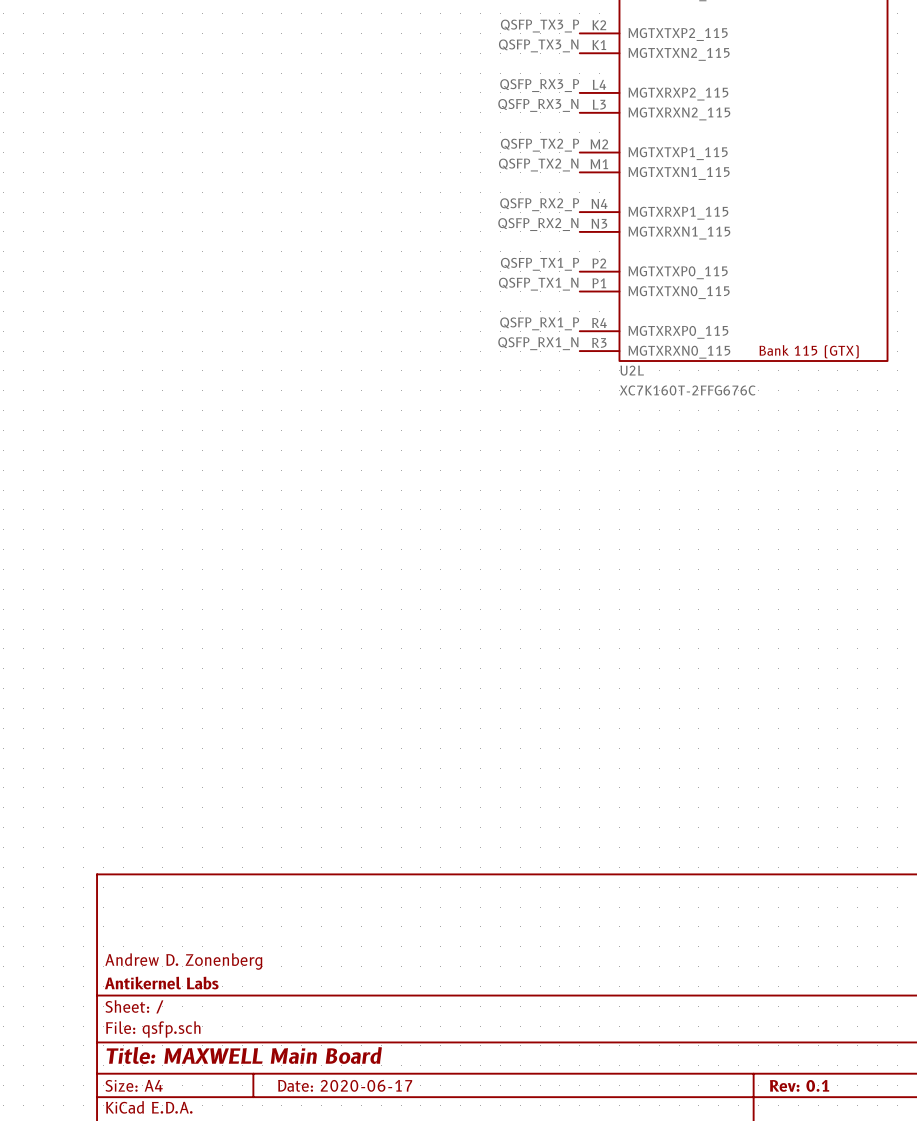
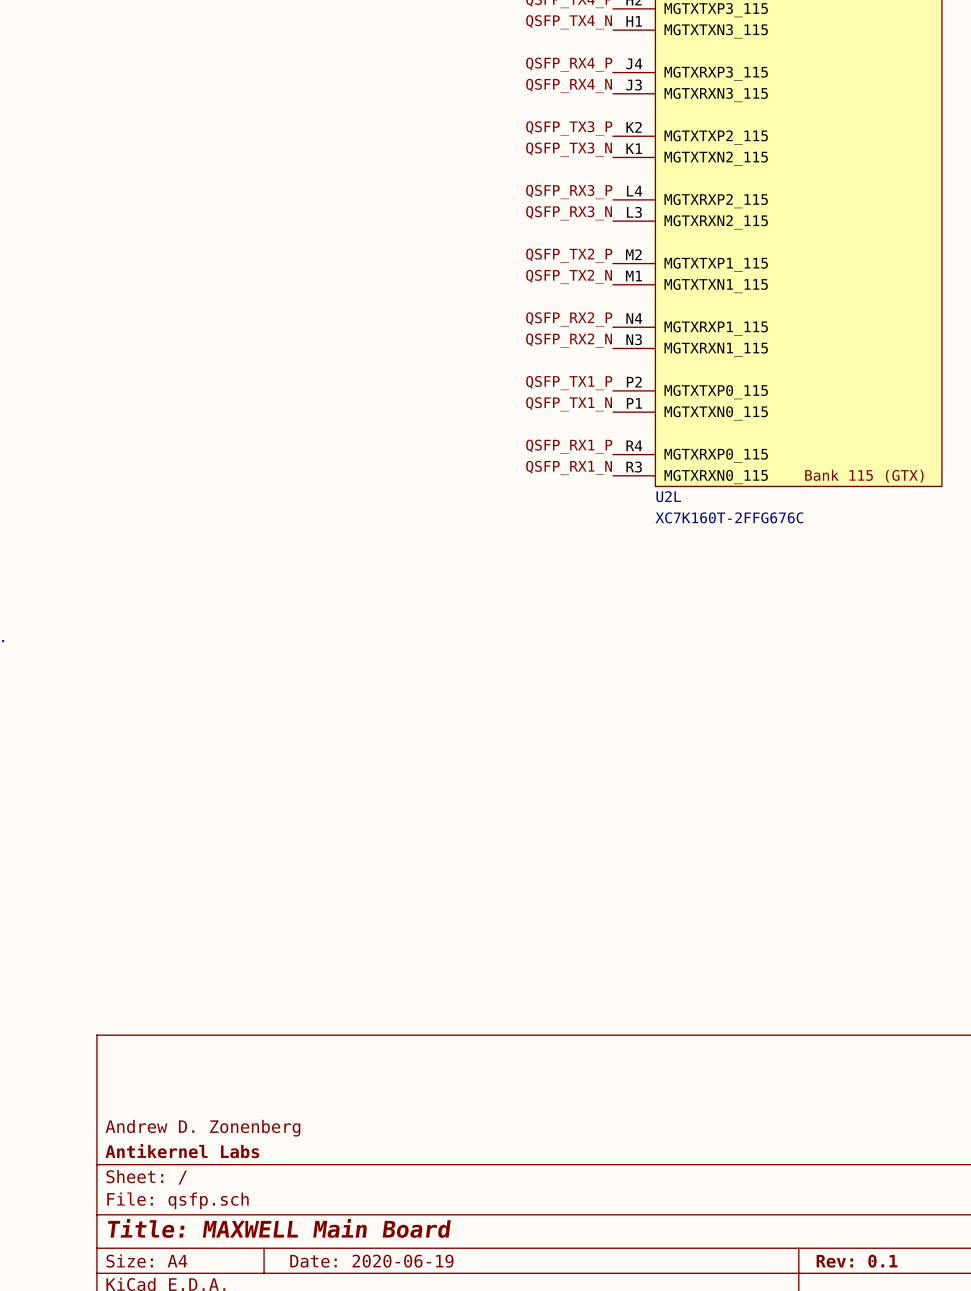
title block: Date: 2020-06-17 (345, 1085) -> Date: 2020-06-19 (371, 1261)

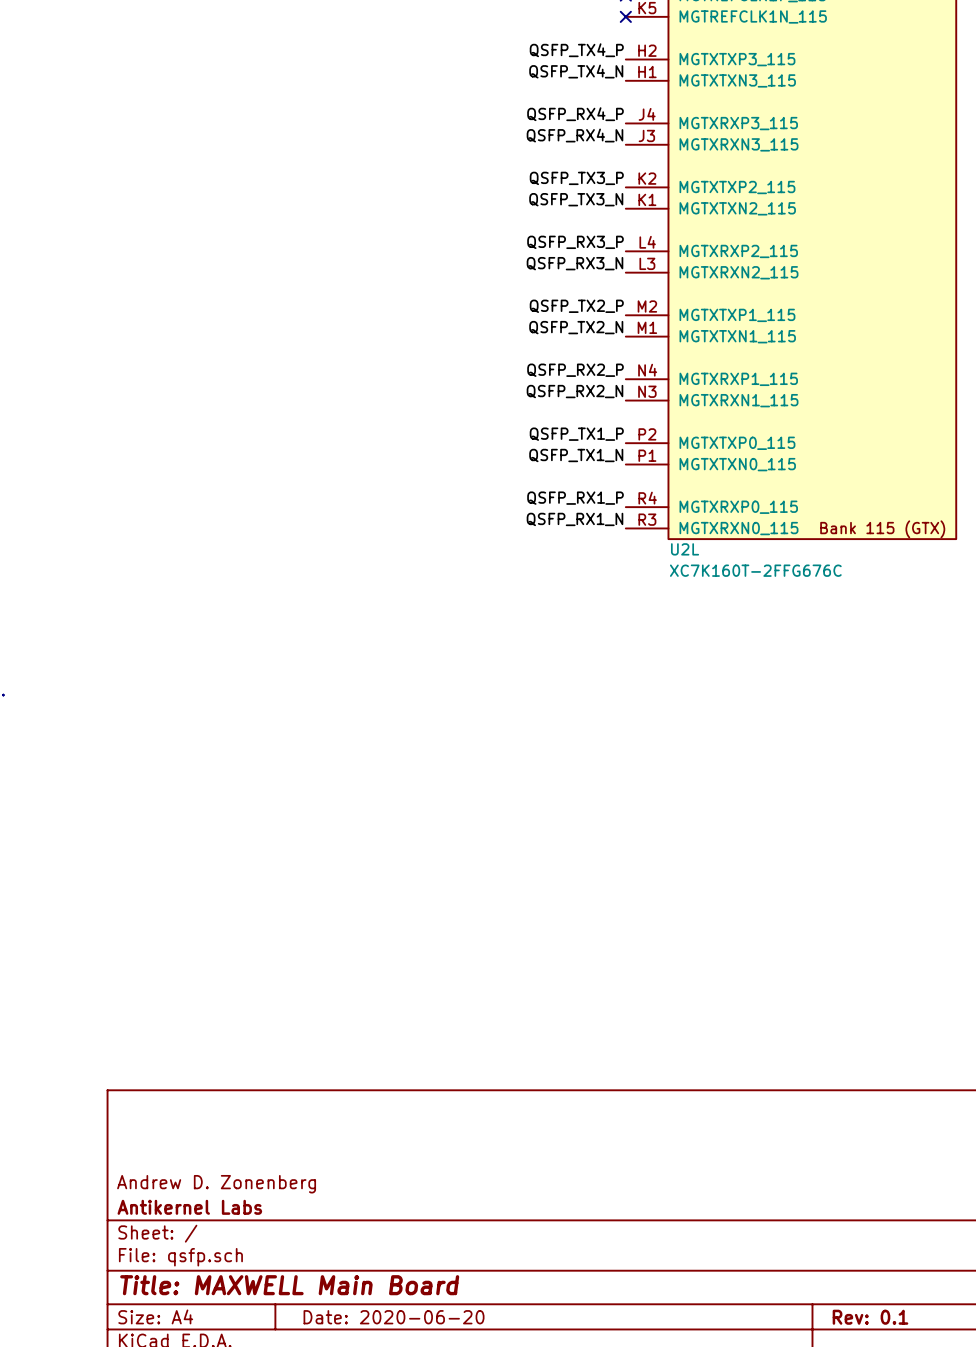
title block: Date: 2020-06-19 (371, 1261) -> Date: 2020-06-20 (394, 1317)

